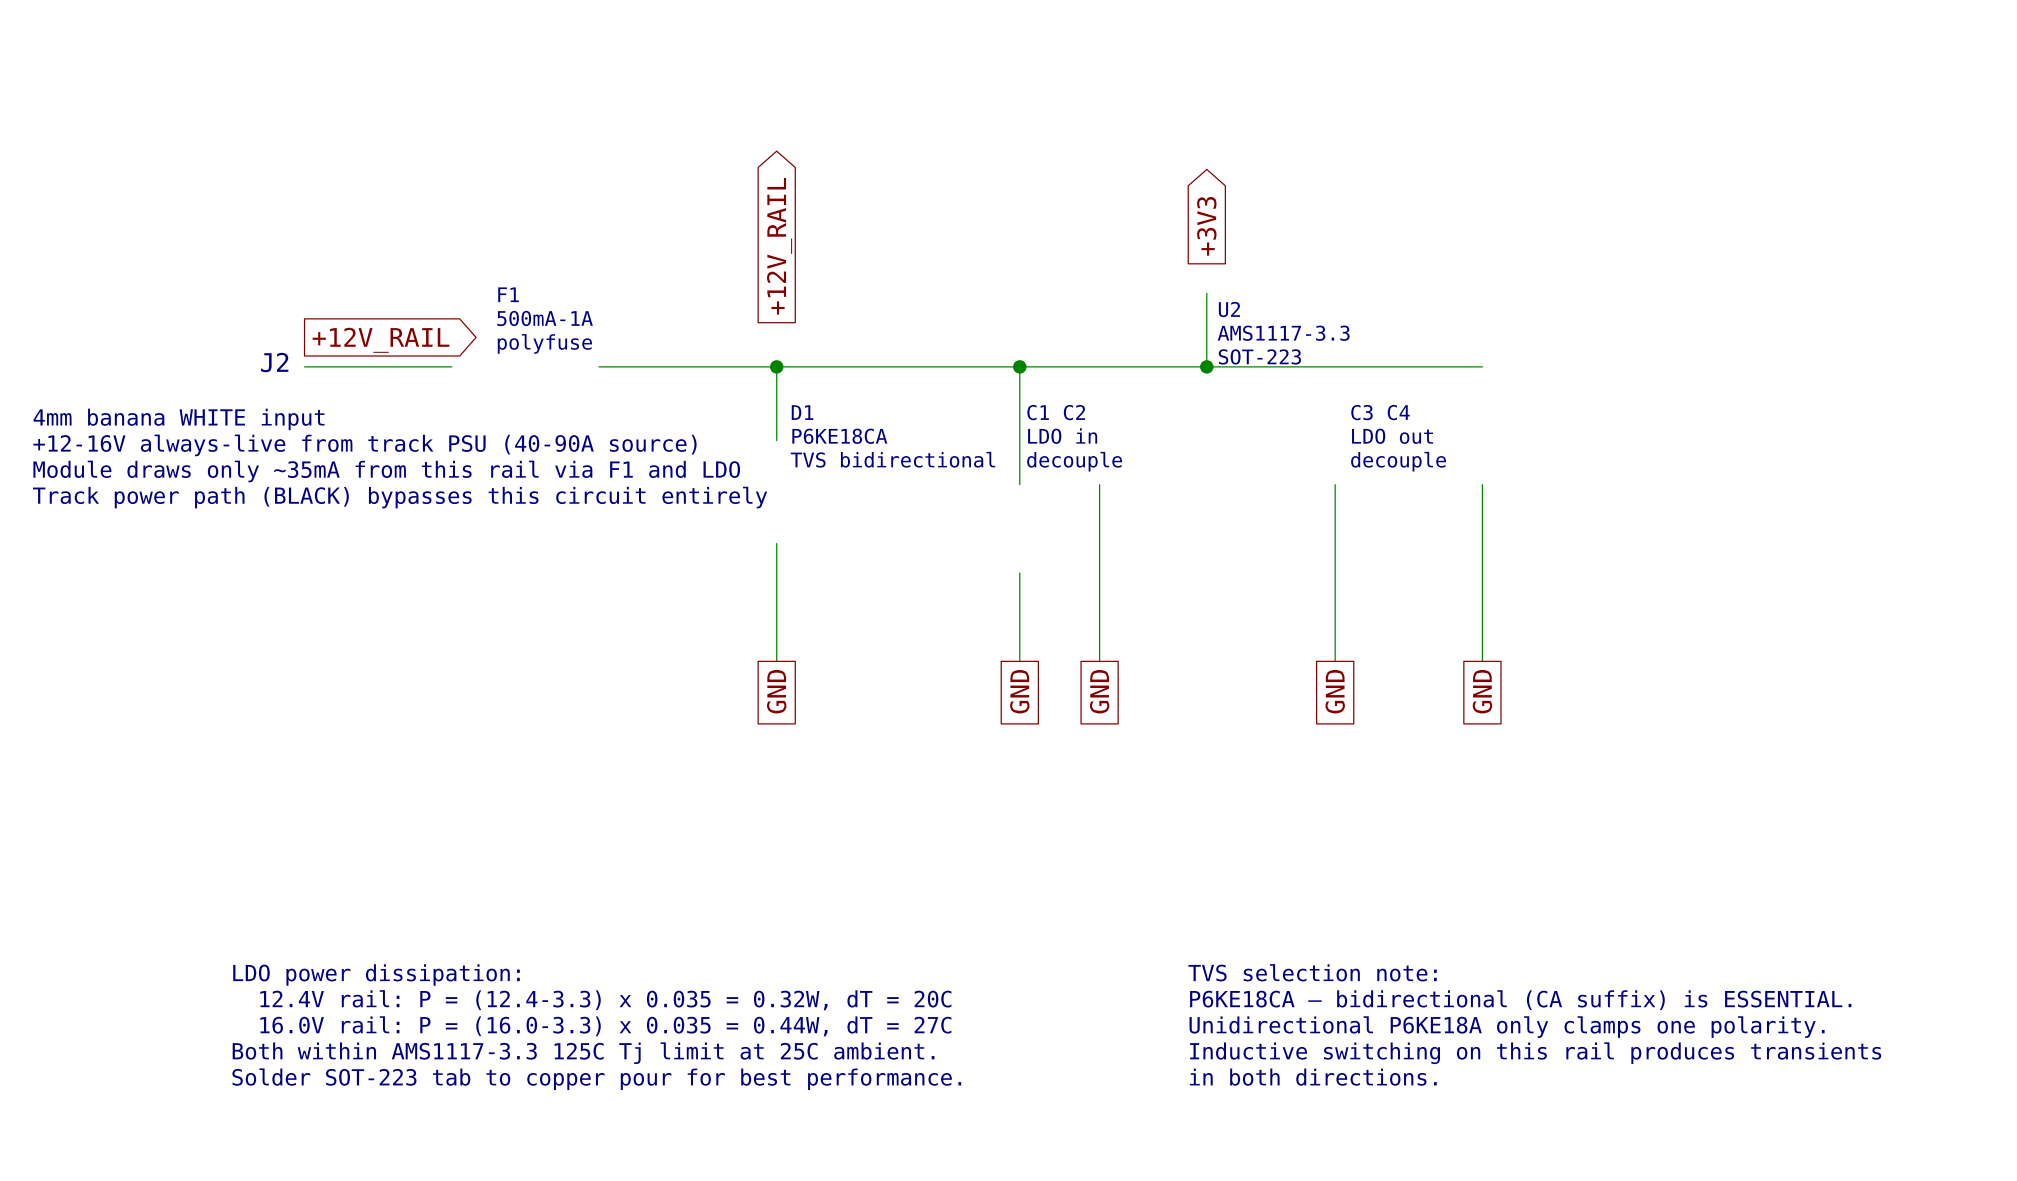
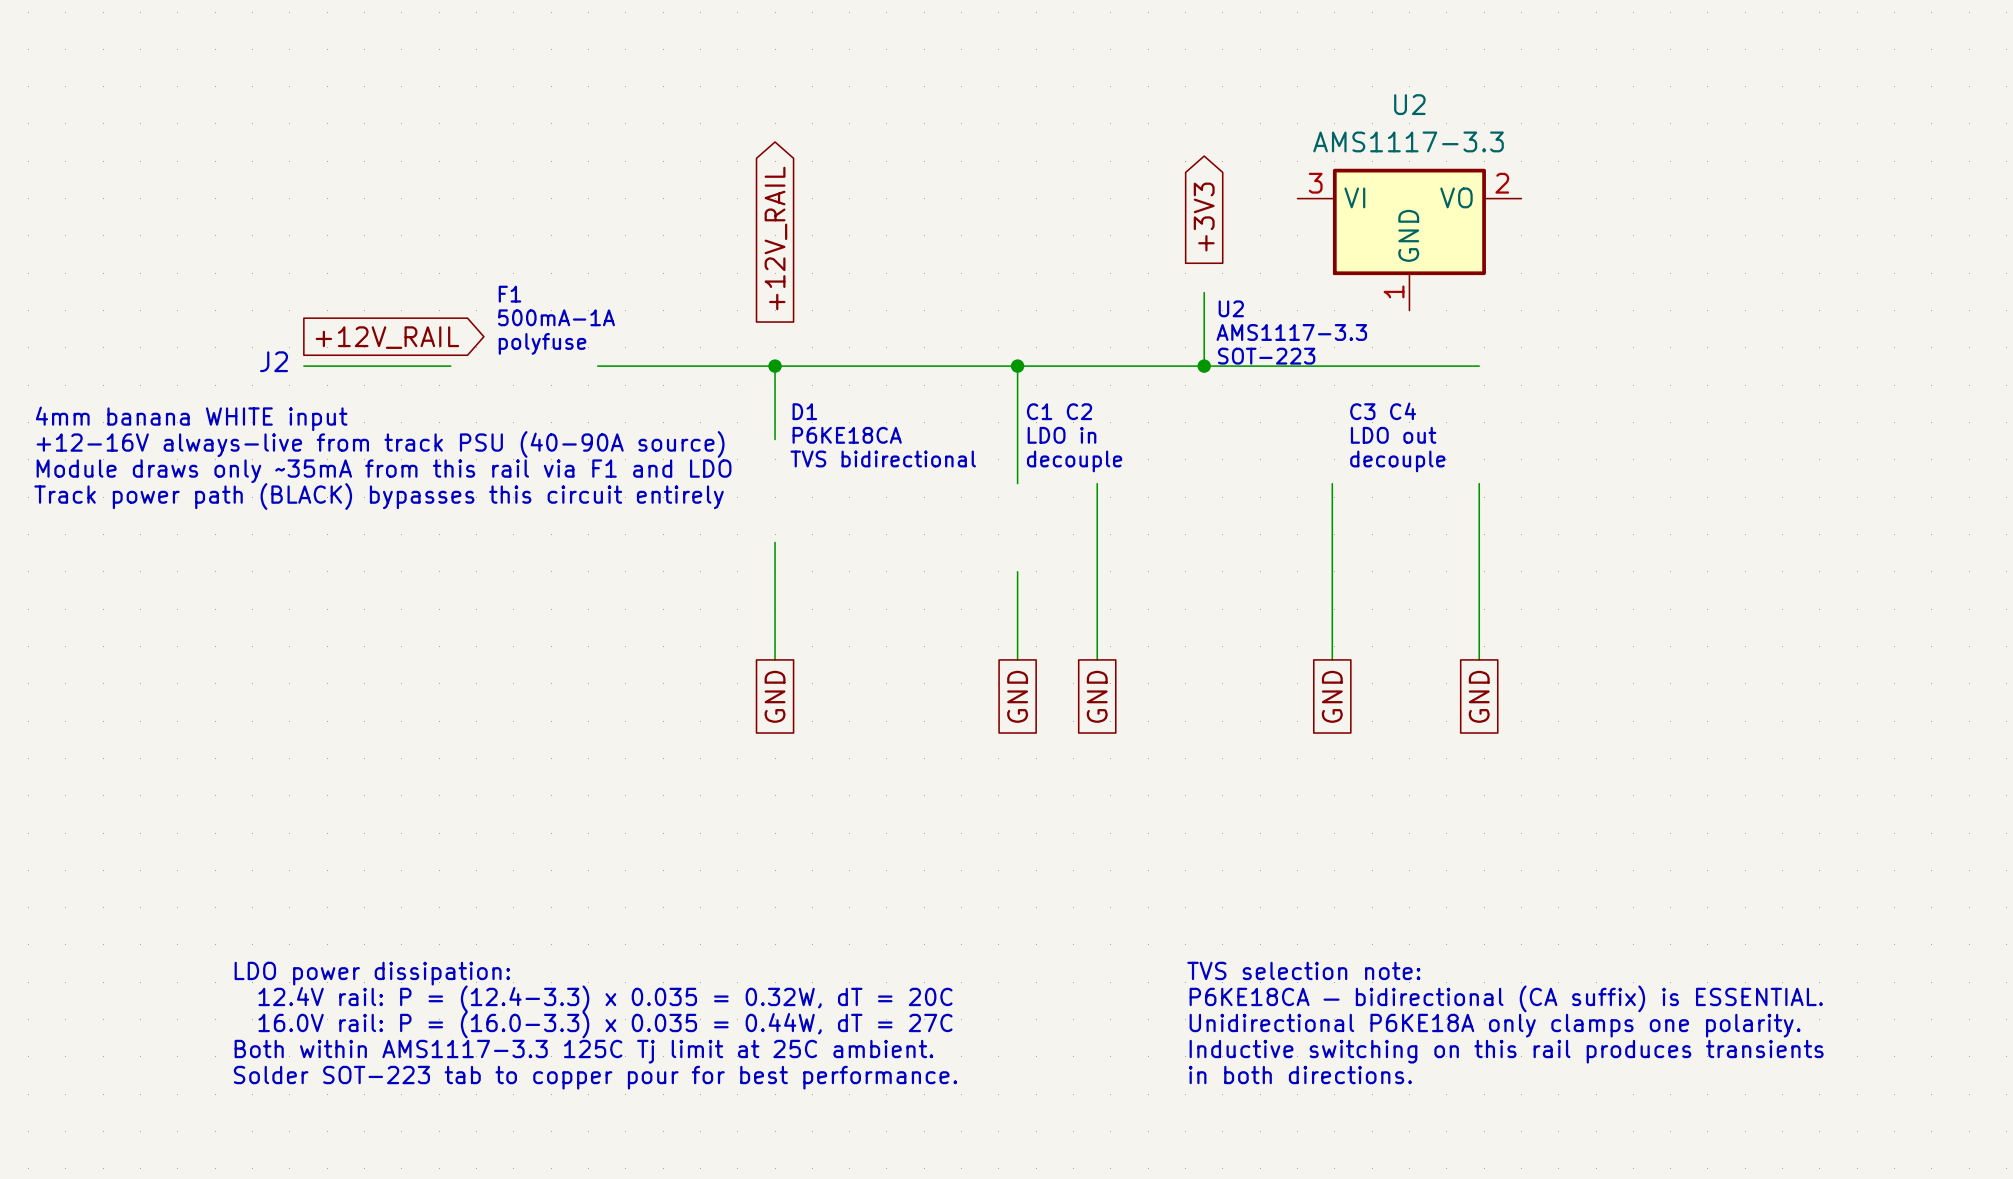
U2: none -> AMS1117-3.3 (1409, 239)

